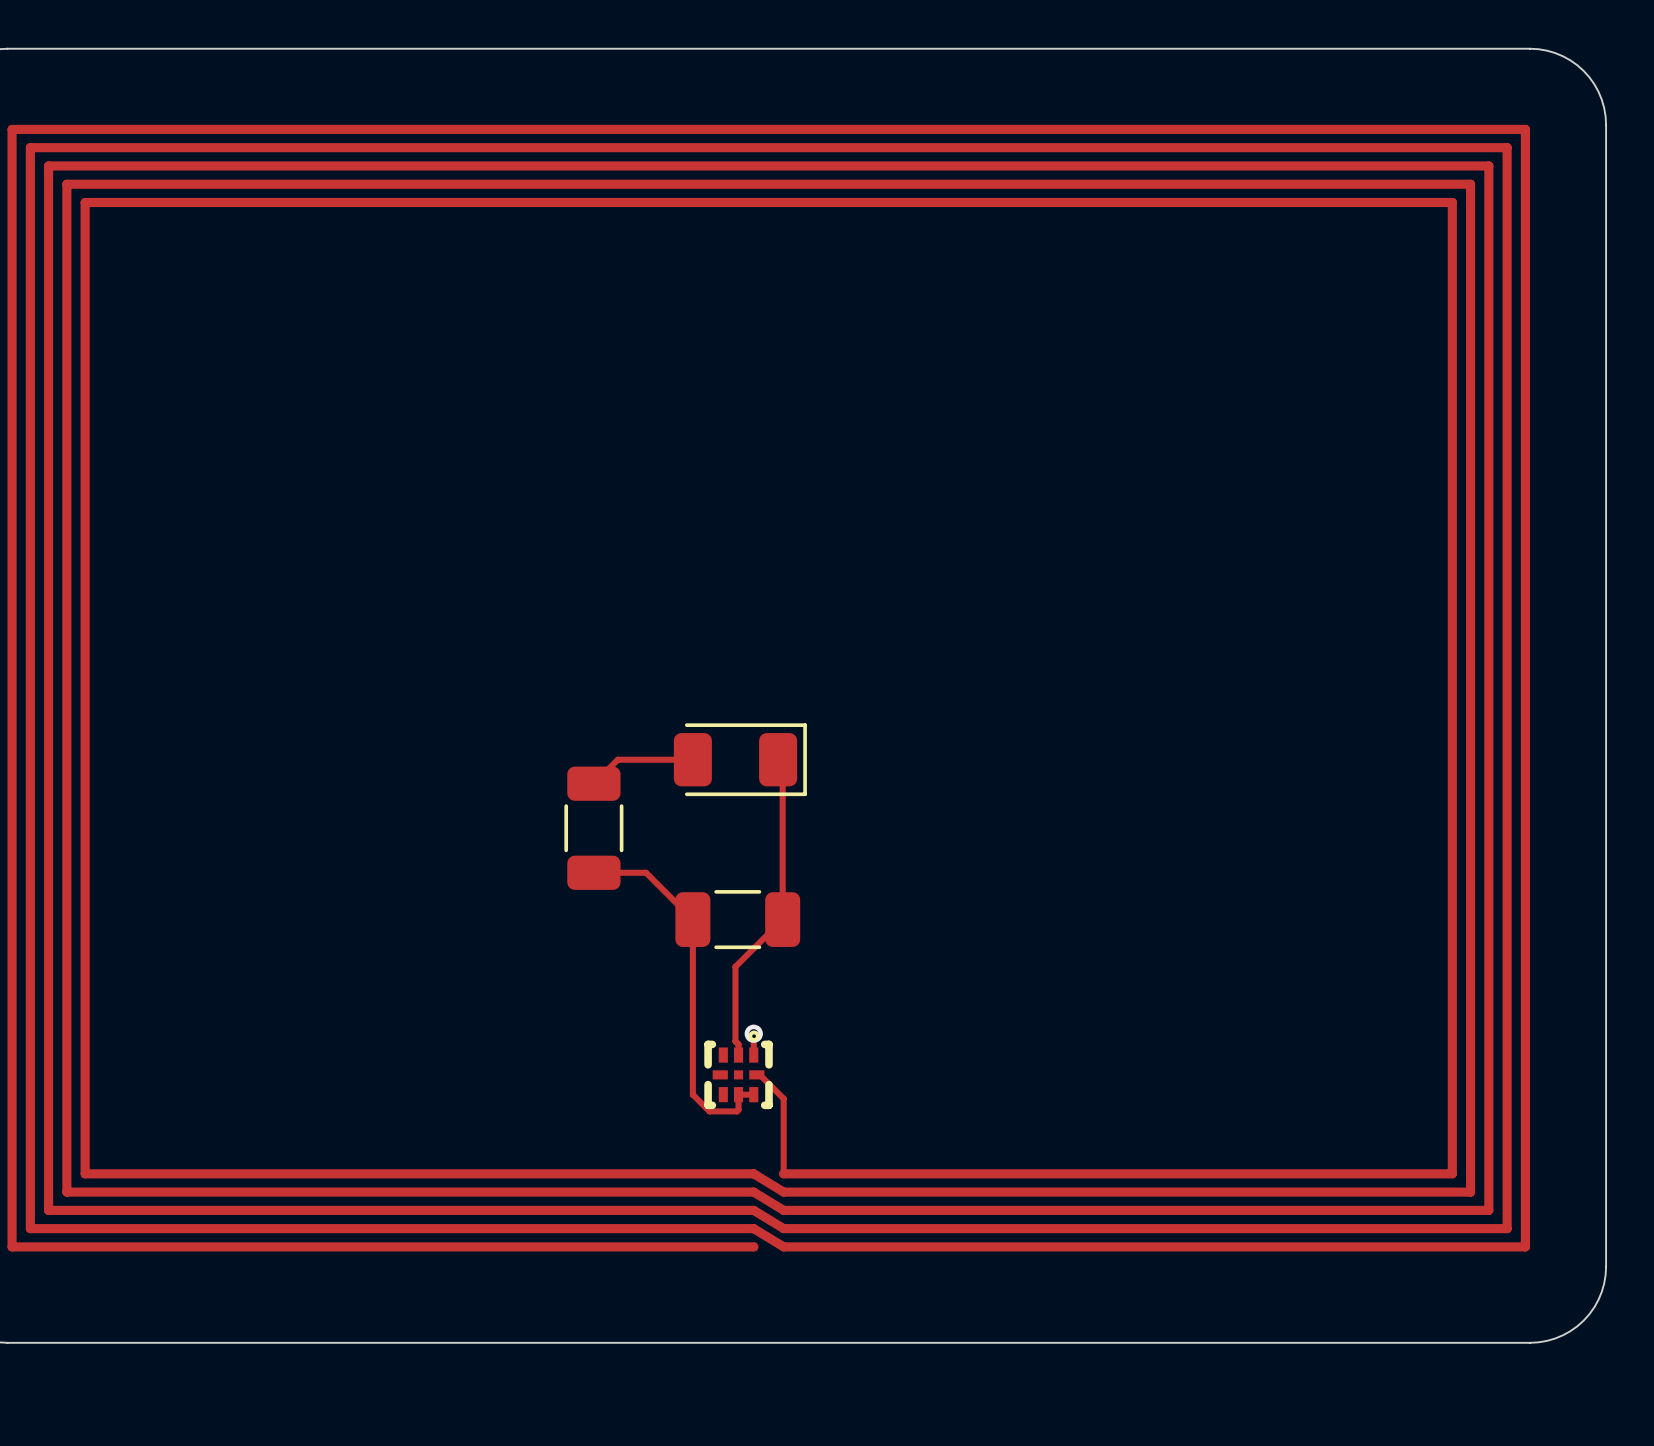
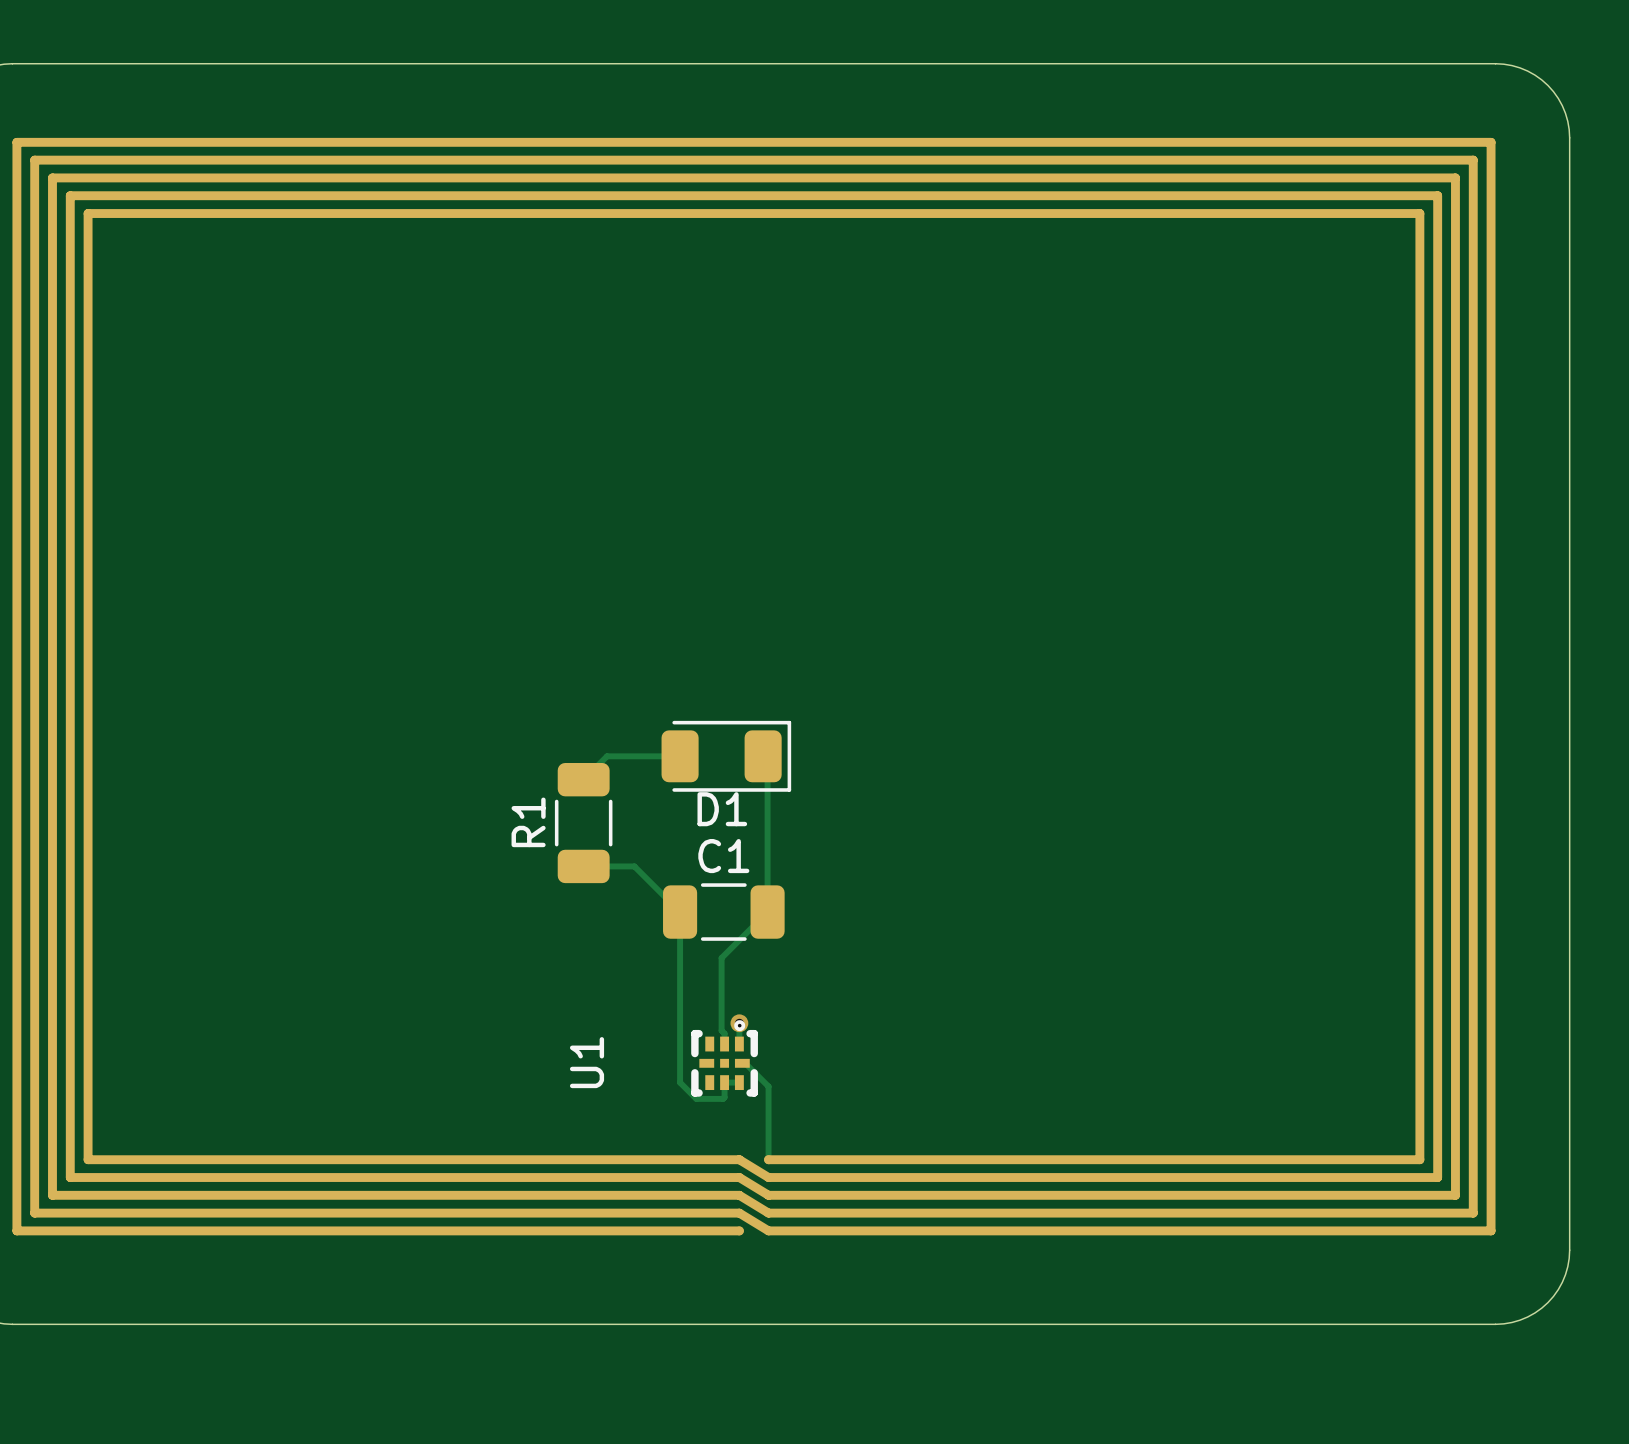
D1 name: none -> D1 (722, 809)
R1 name: none -> R1 (528, 822)
C1 name: none -> C1 (723, 856)
U1 name: none -> U1 (587, 1062)

